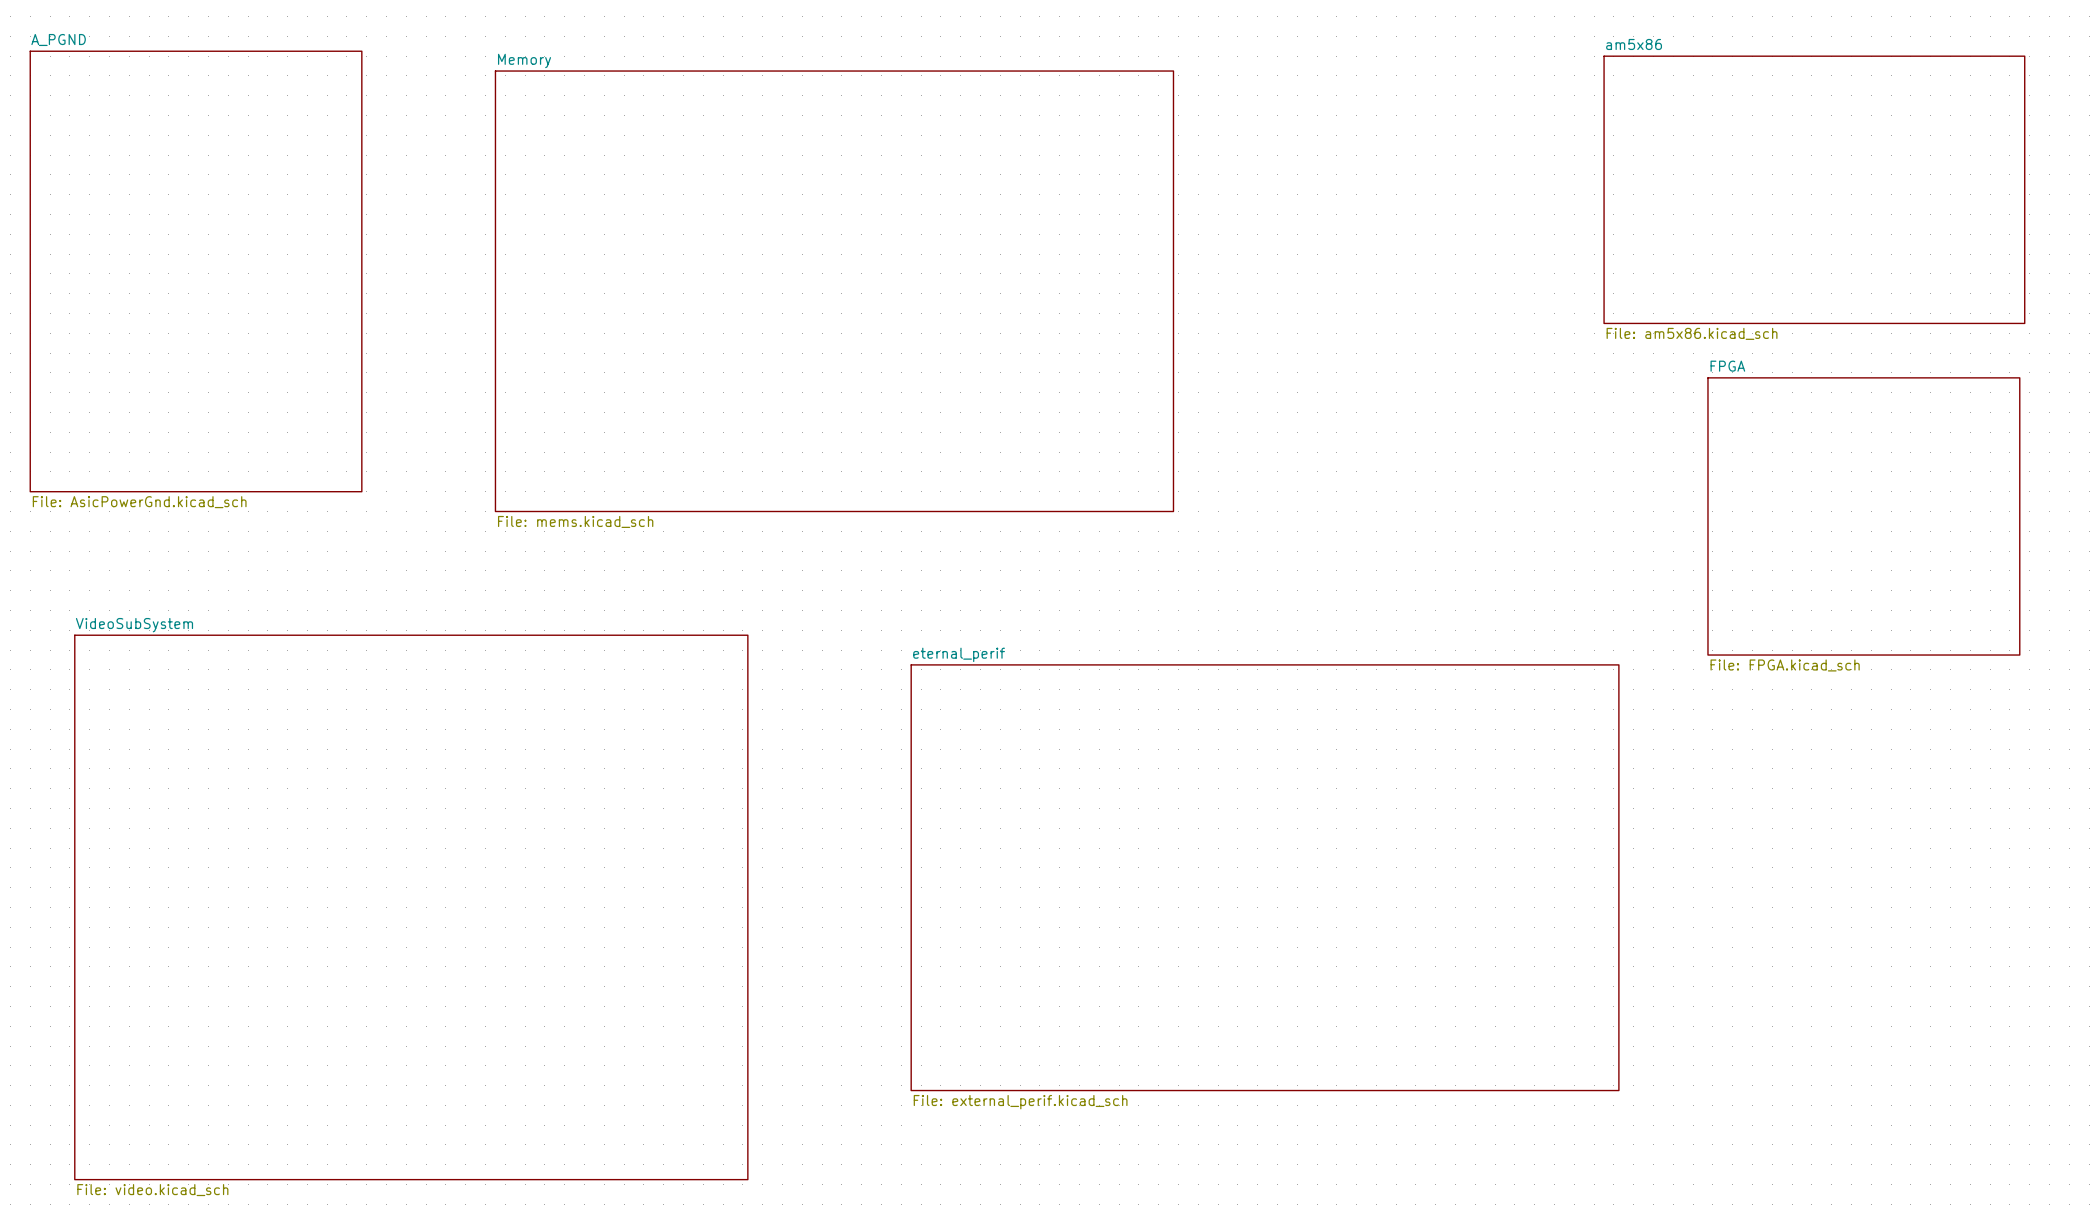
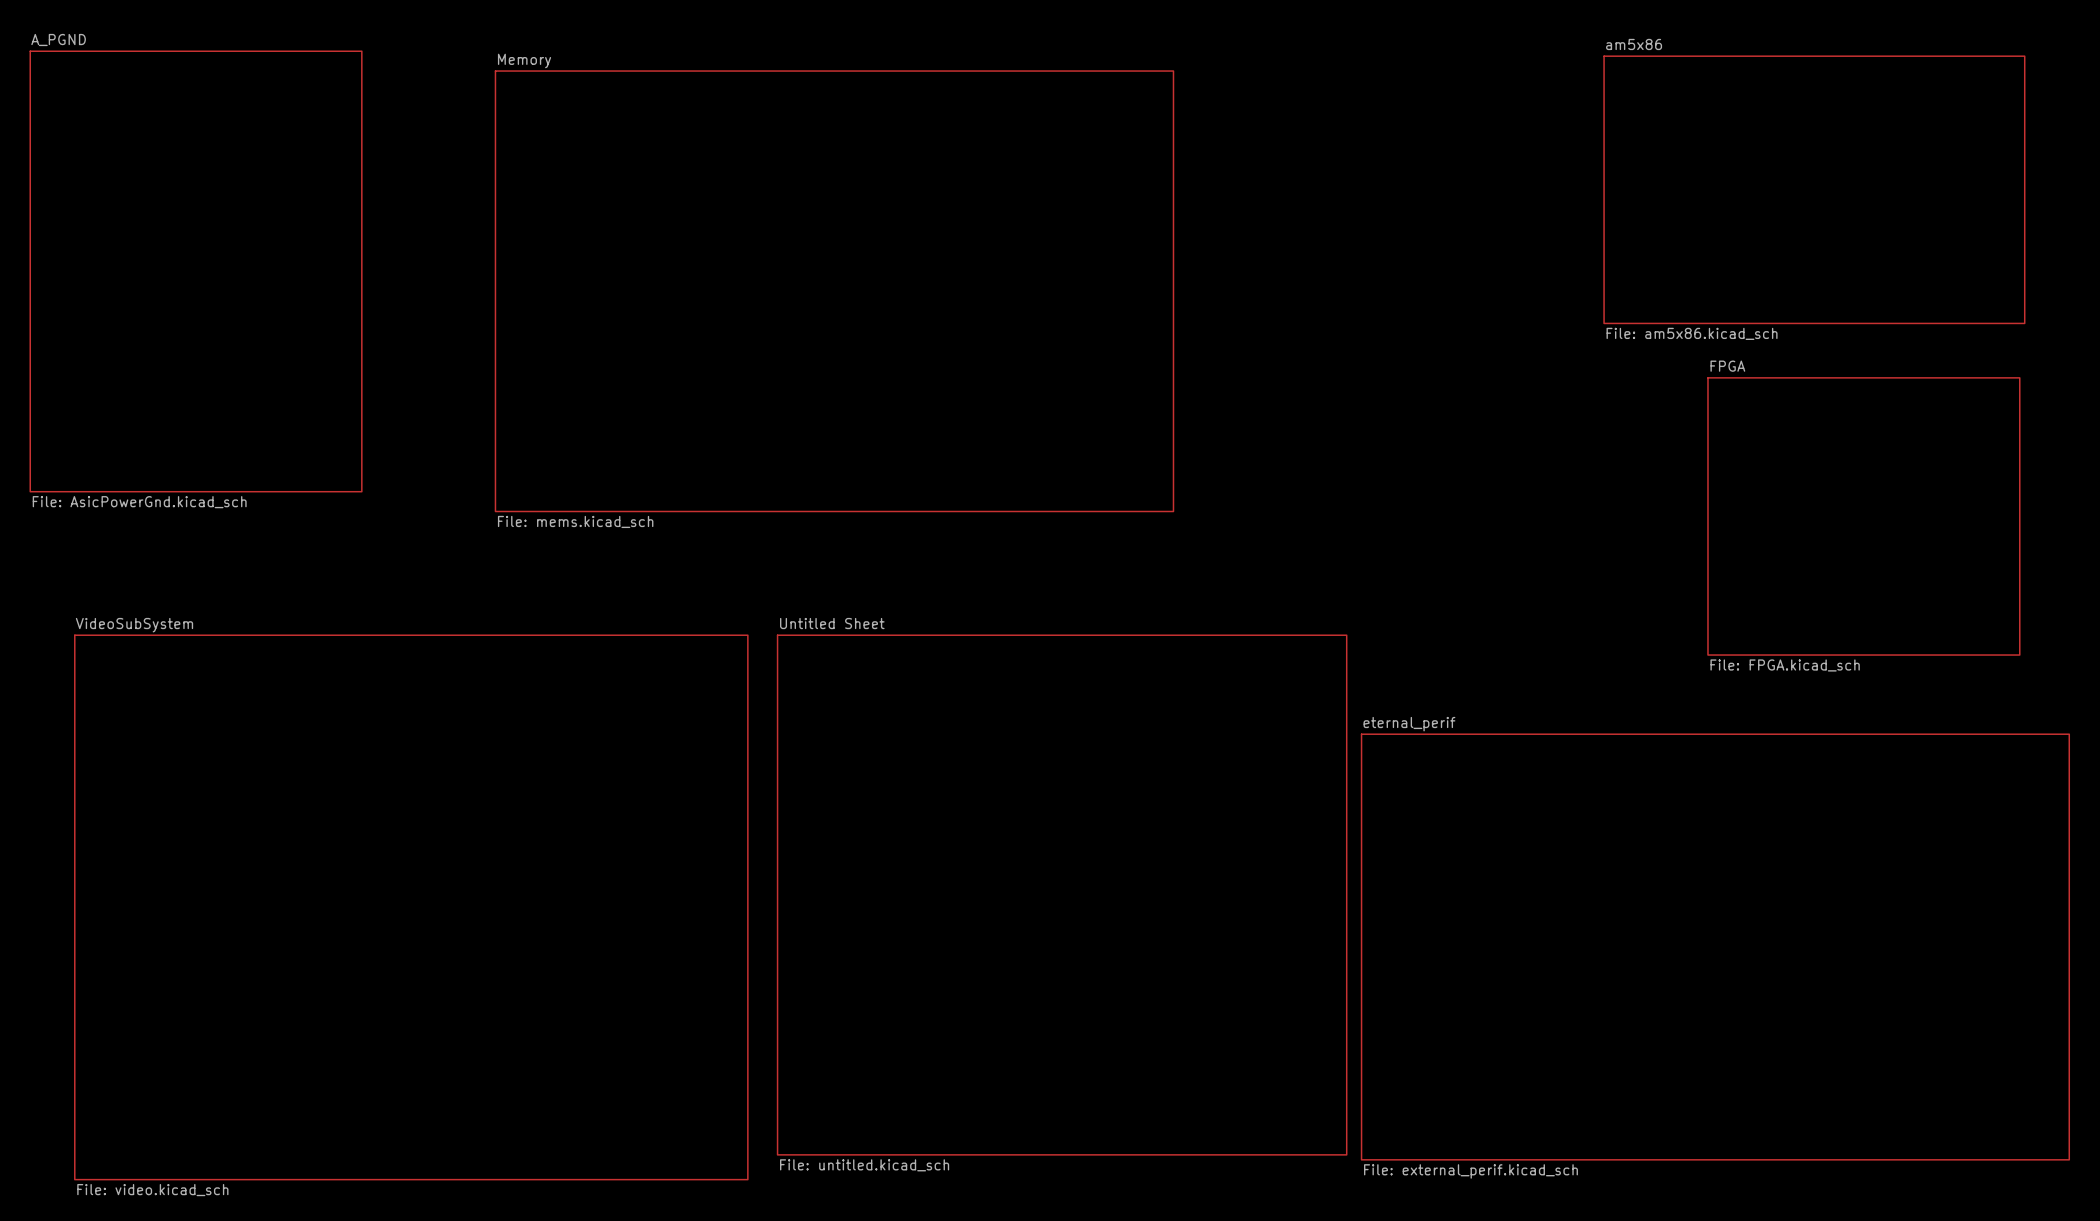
sheet eternal_perif: File: external_perif.kicad_sch (1265, 877) -> none
sheet Untitled Sheet: none -> File: untitled.kicad_sch (1062, 895)
sheet eternal_perif: none -> File: external_perif.kicad_sch (1715, 947)

